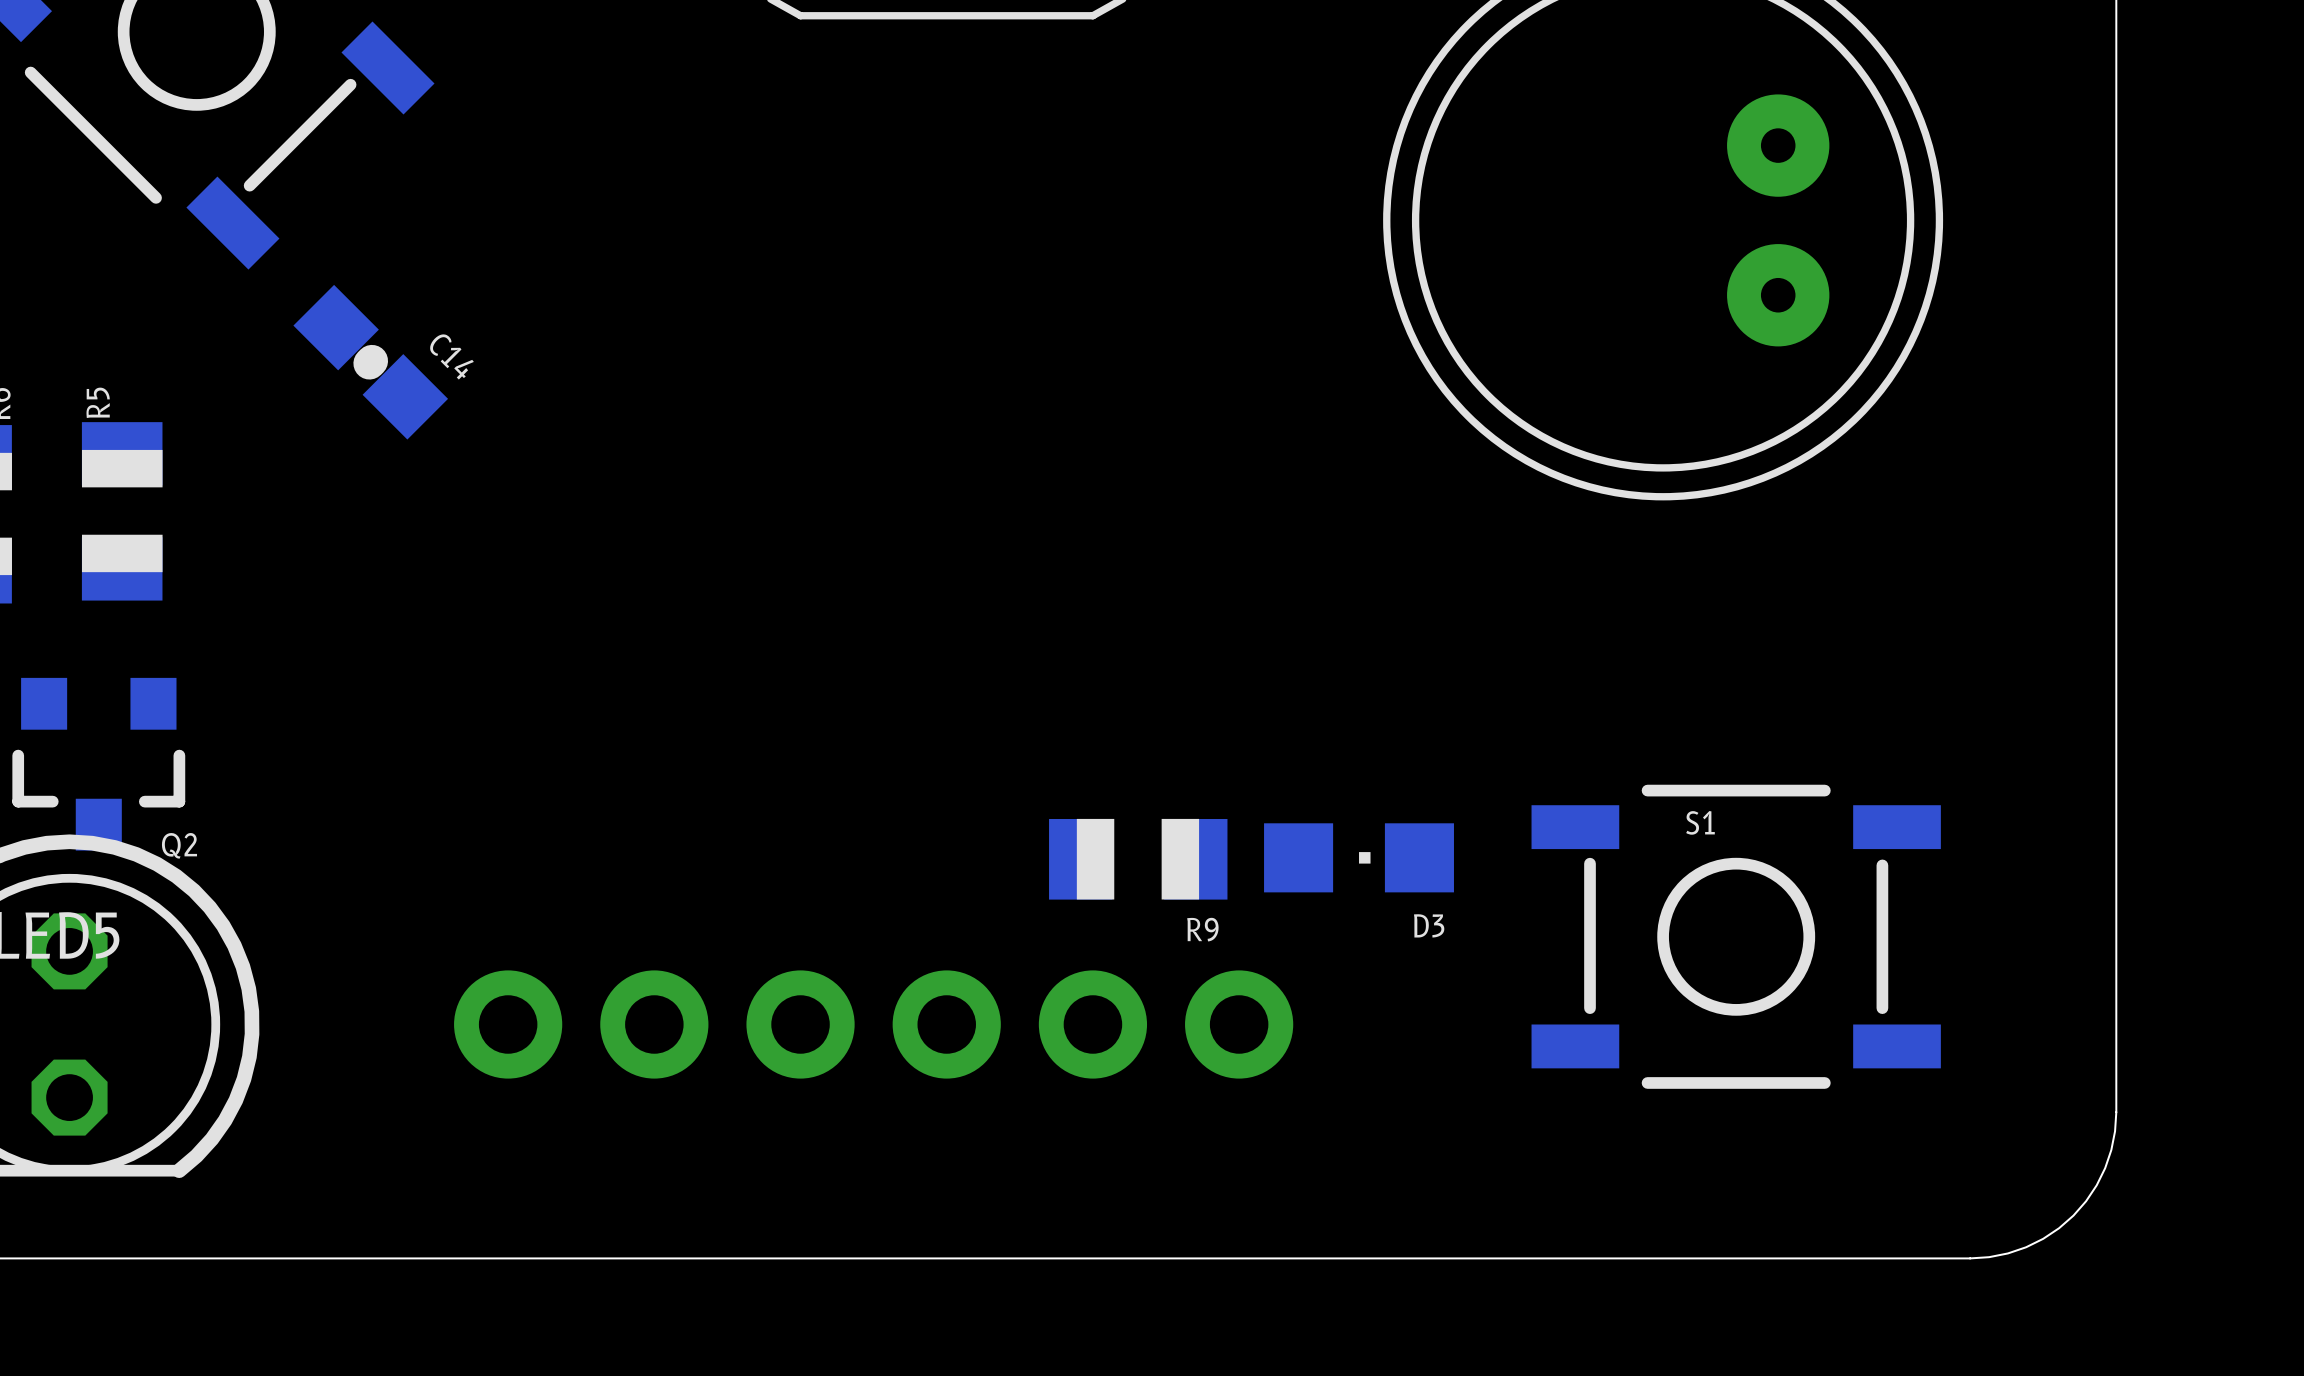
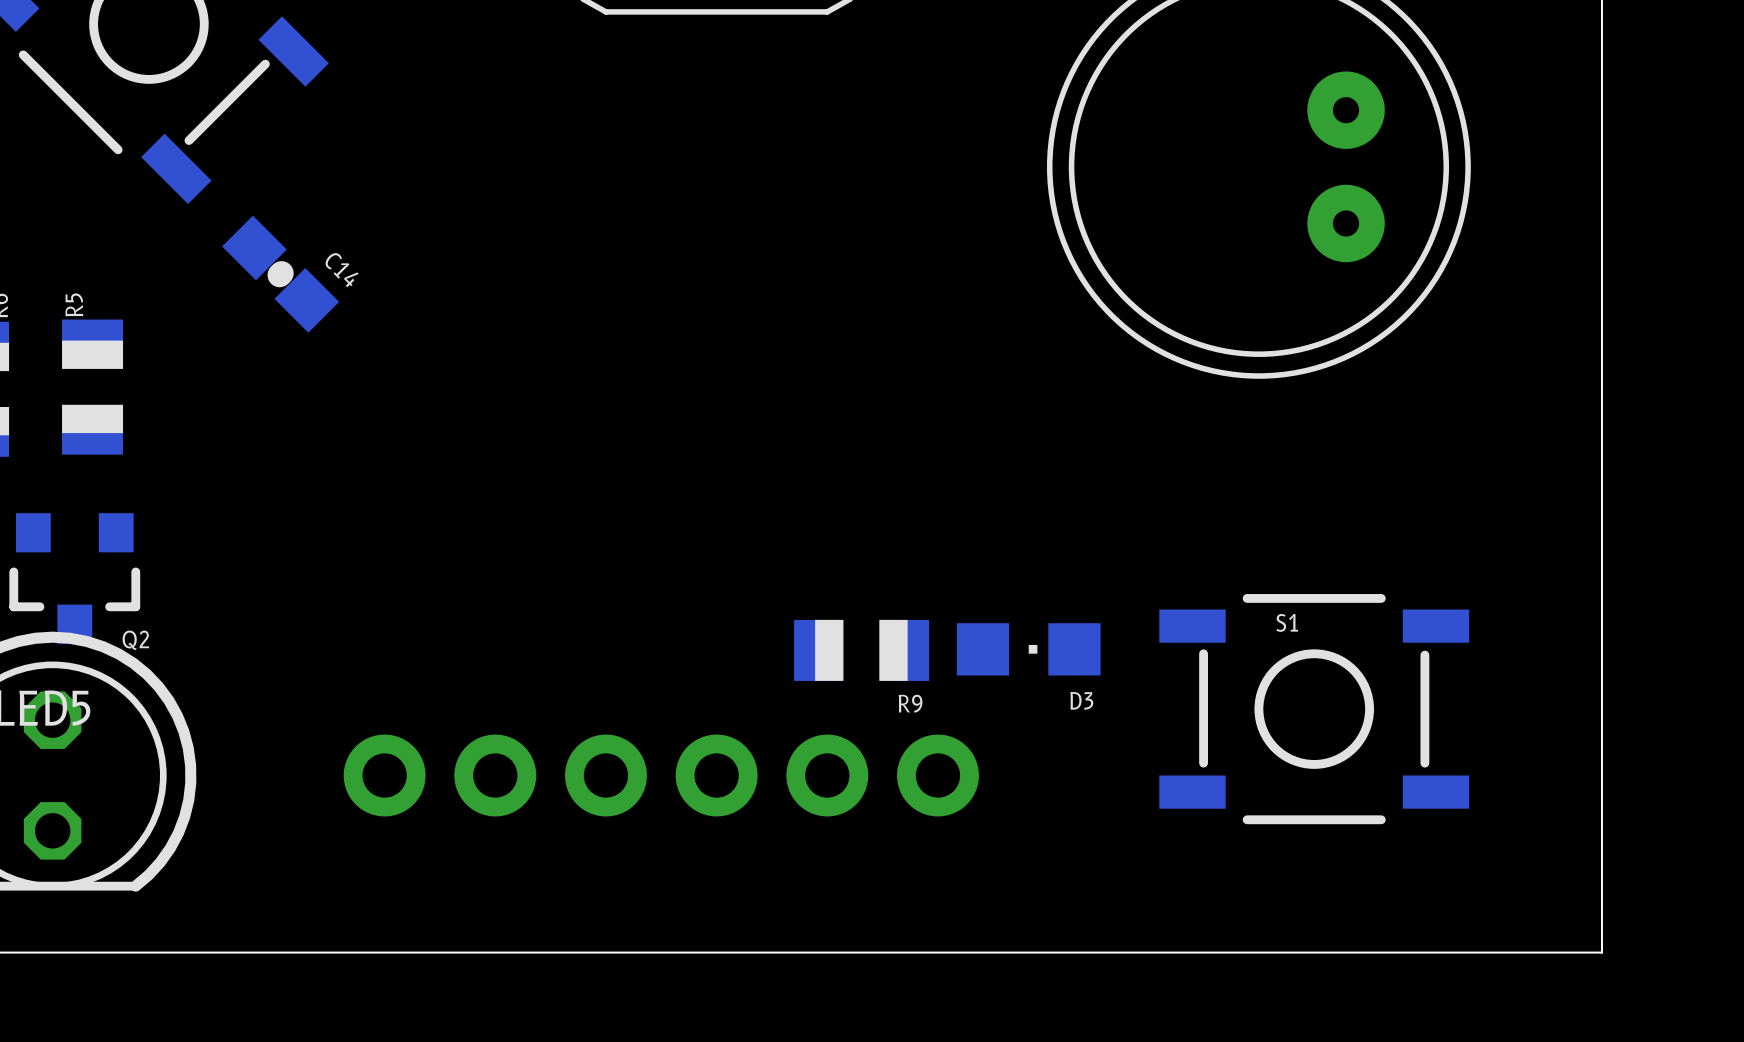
board edge: (2116, 1112) (2111, 1150) (2105, 1168) (2086, 1201) (2073, 1215) (2059, 1228) (2026, 1247) (2007, 1253) (1970, 1258) -> (1601, 841) (1601, 952) (1491, 952)

